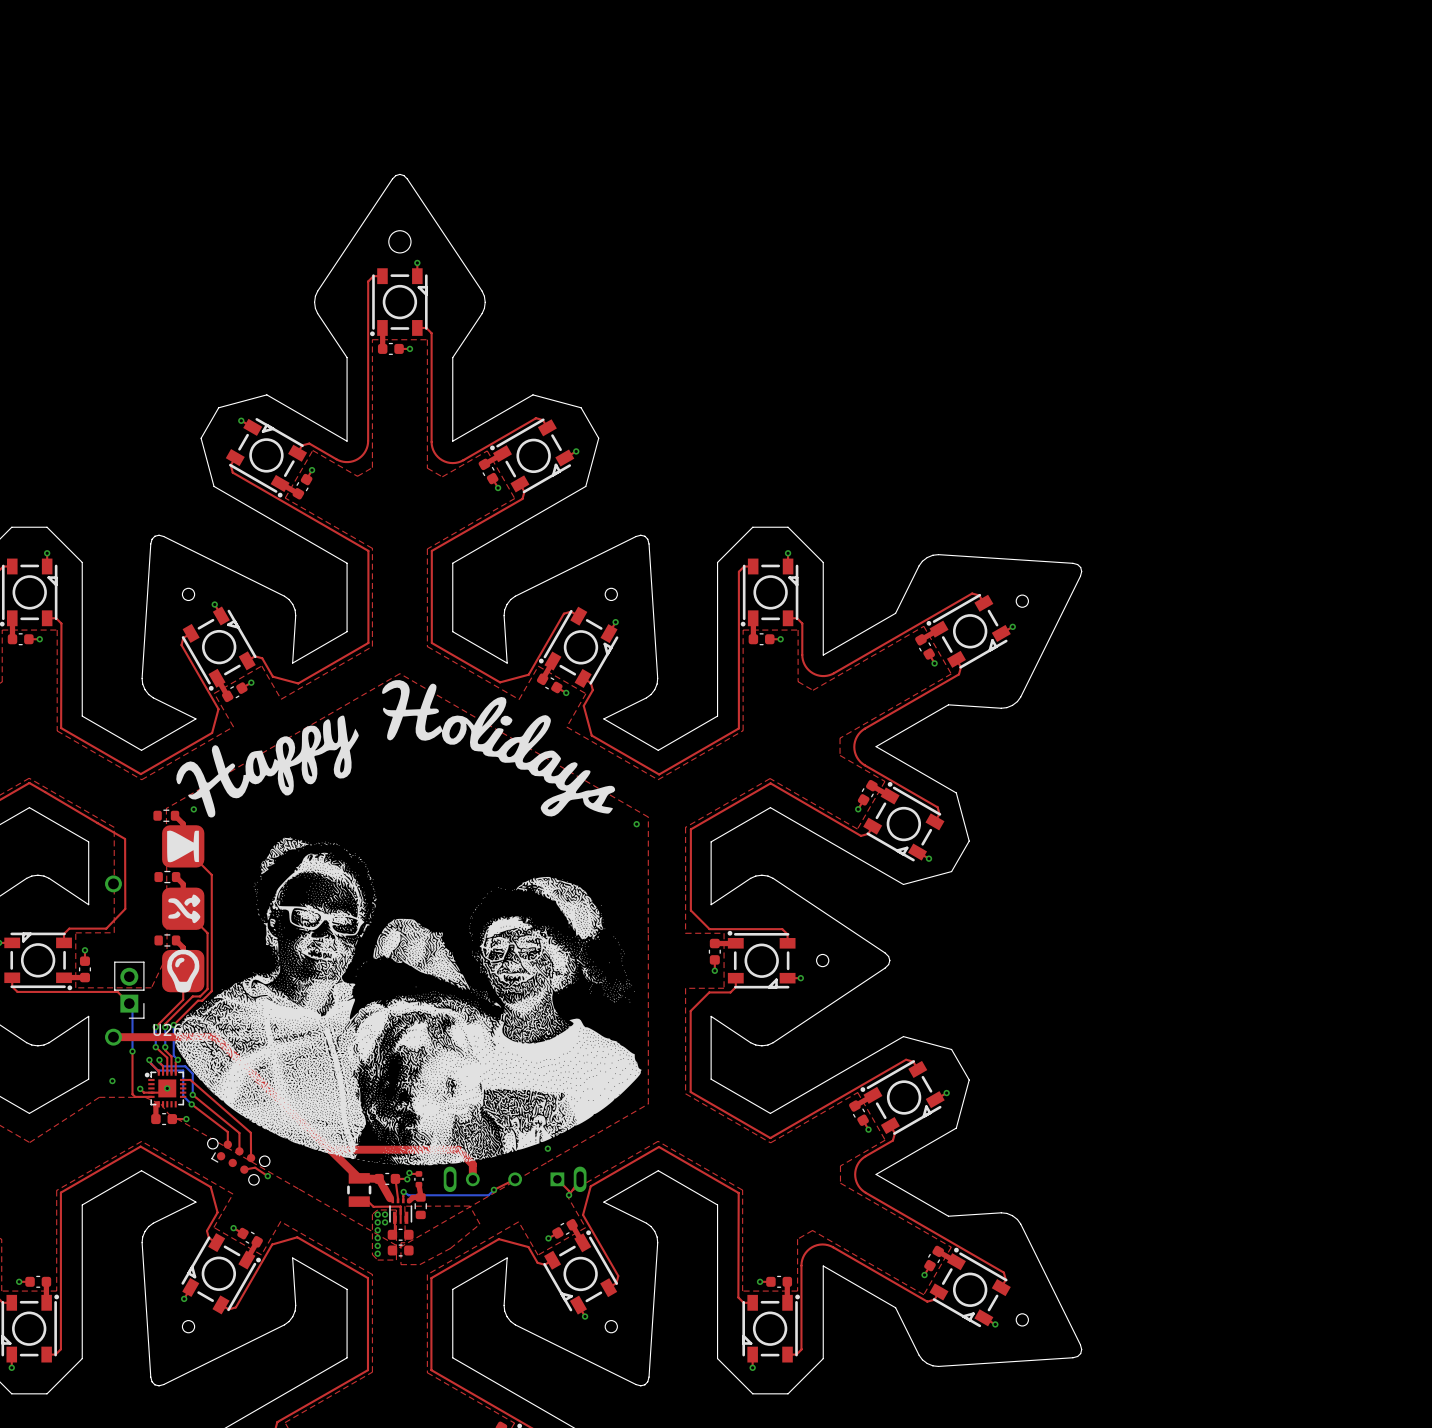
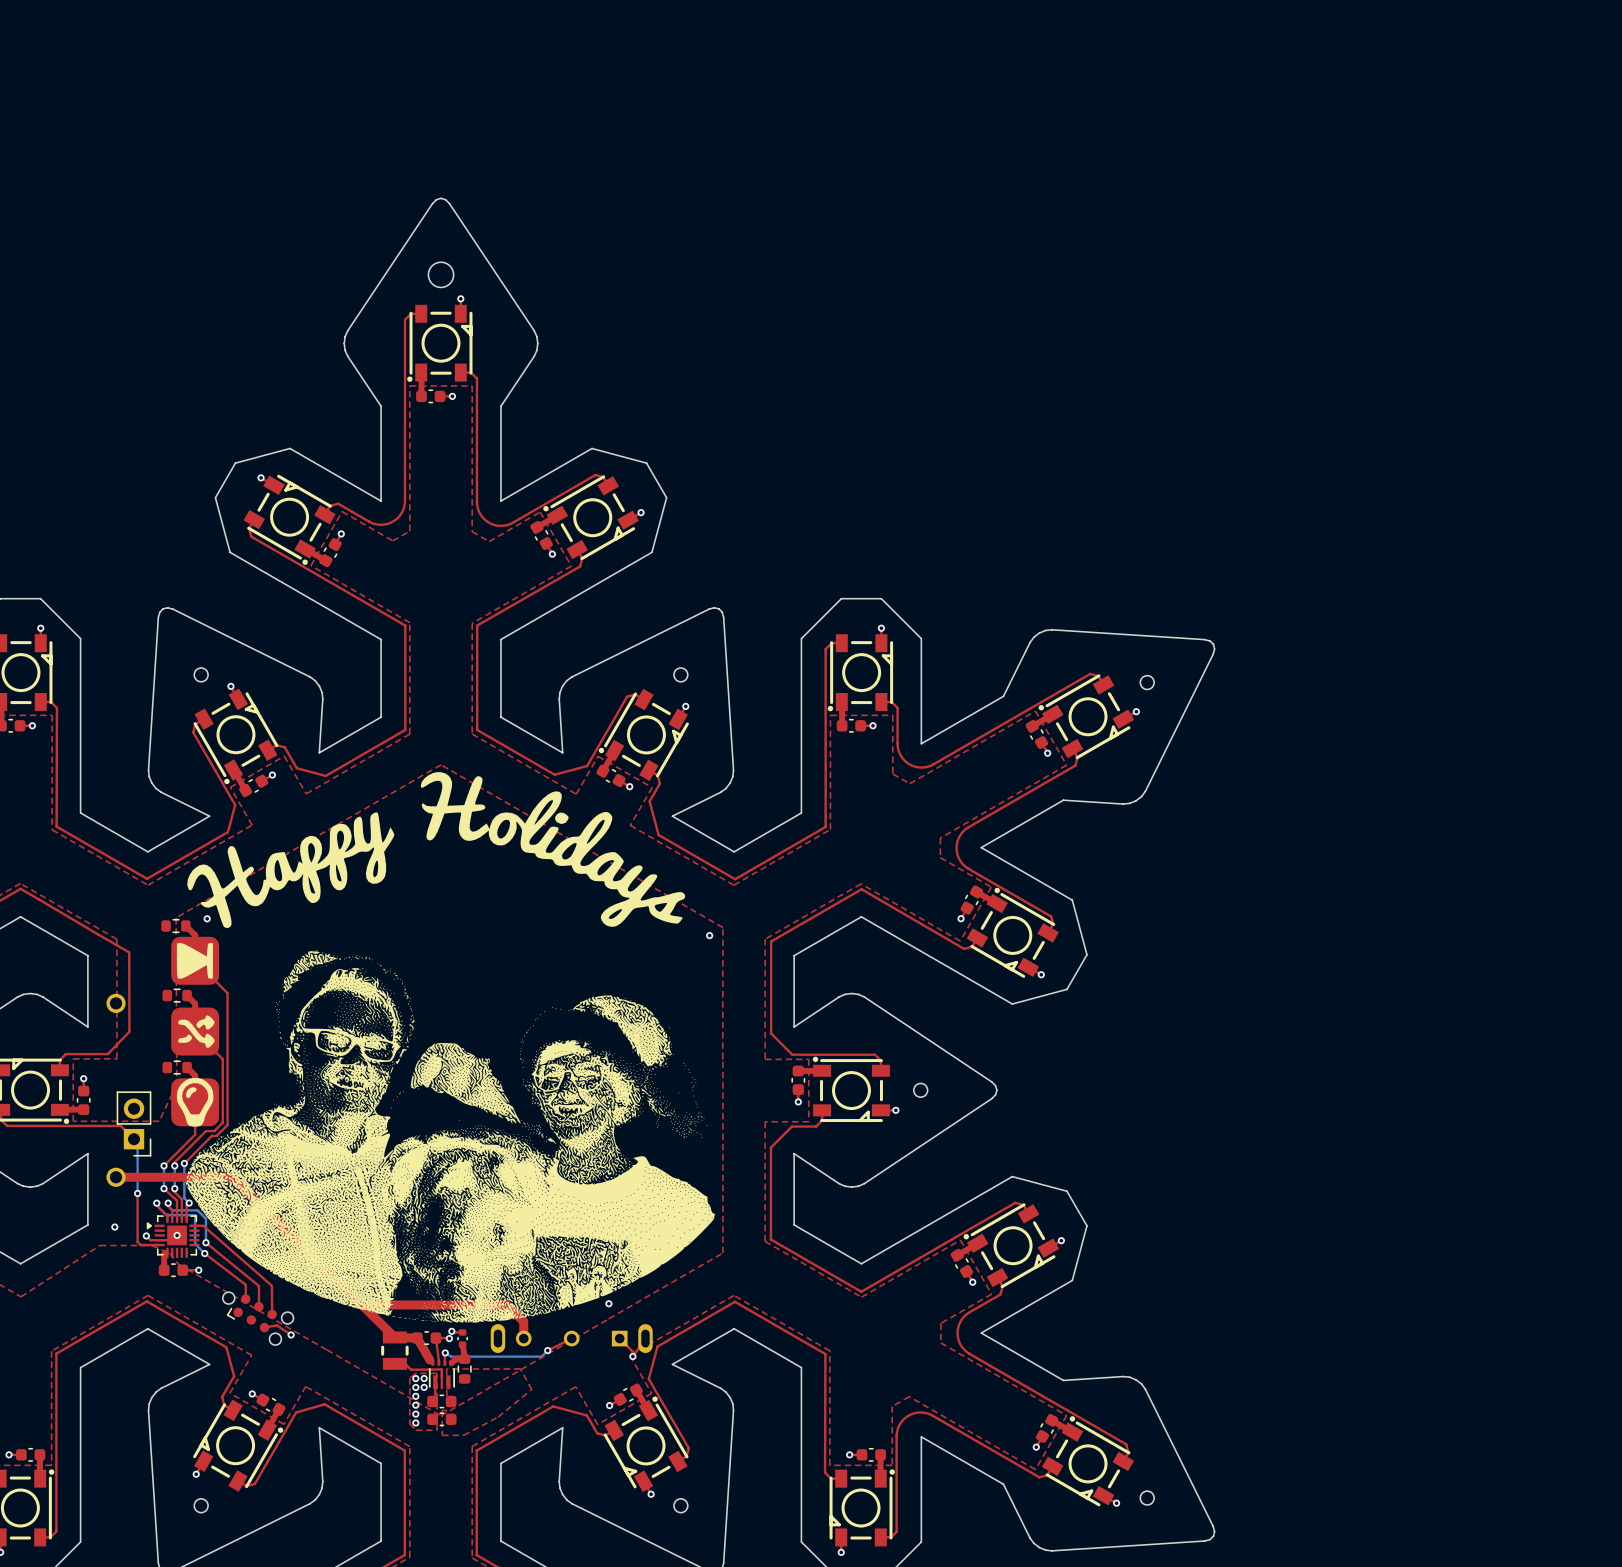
part: none -> (173, 1235)
U26: (165, 1088) -> none

